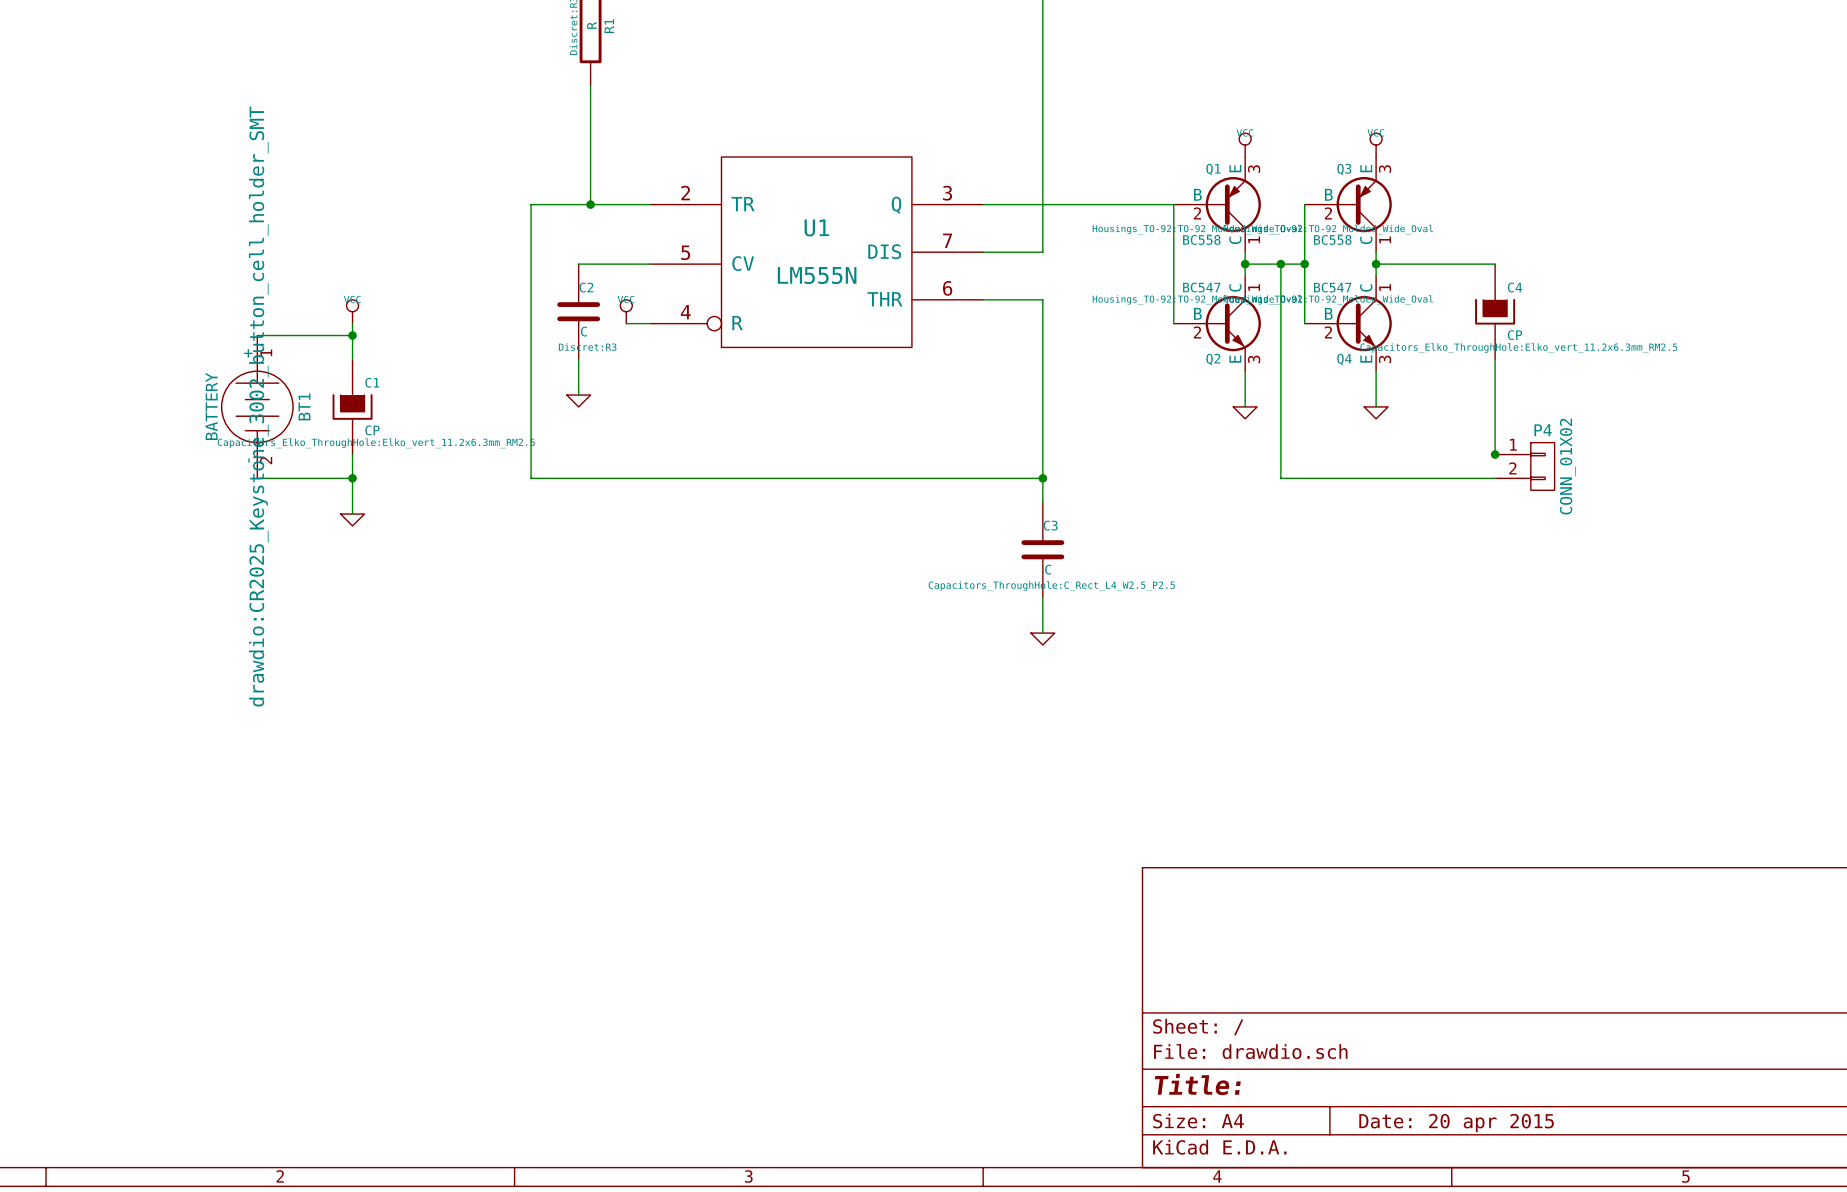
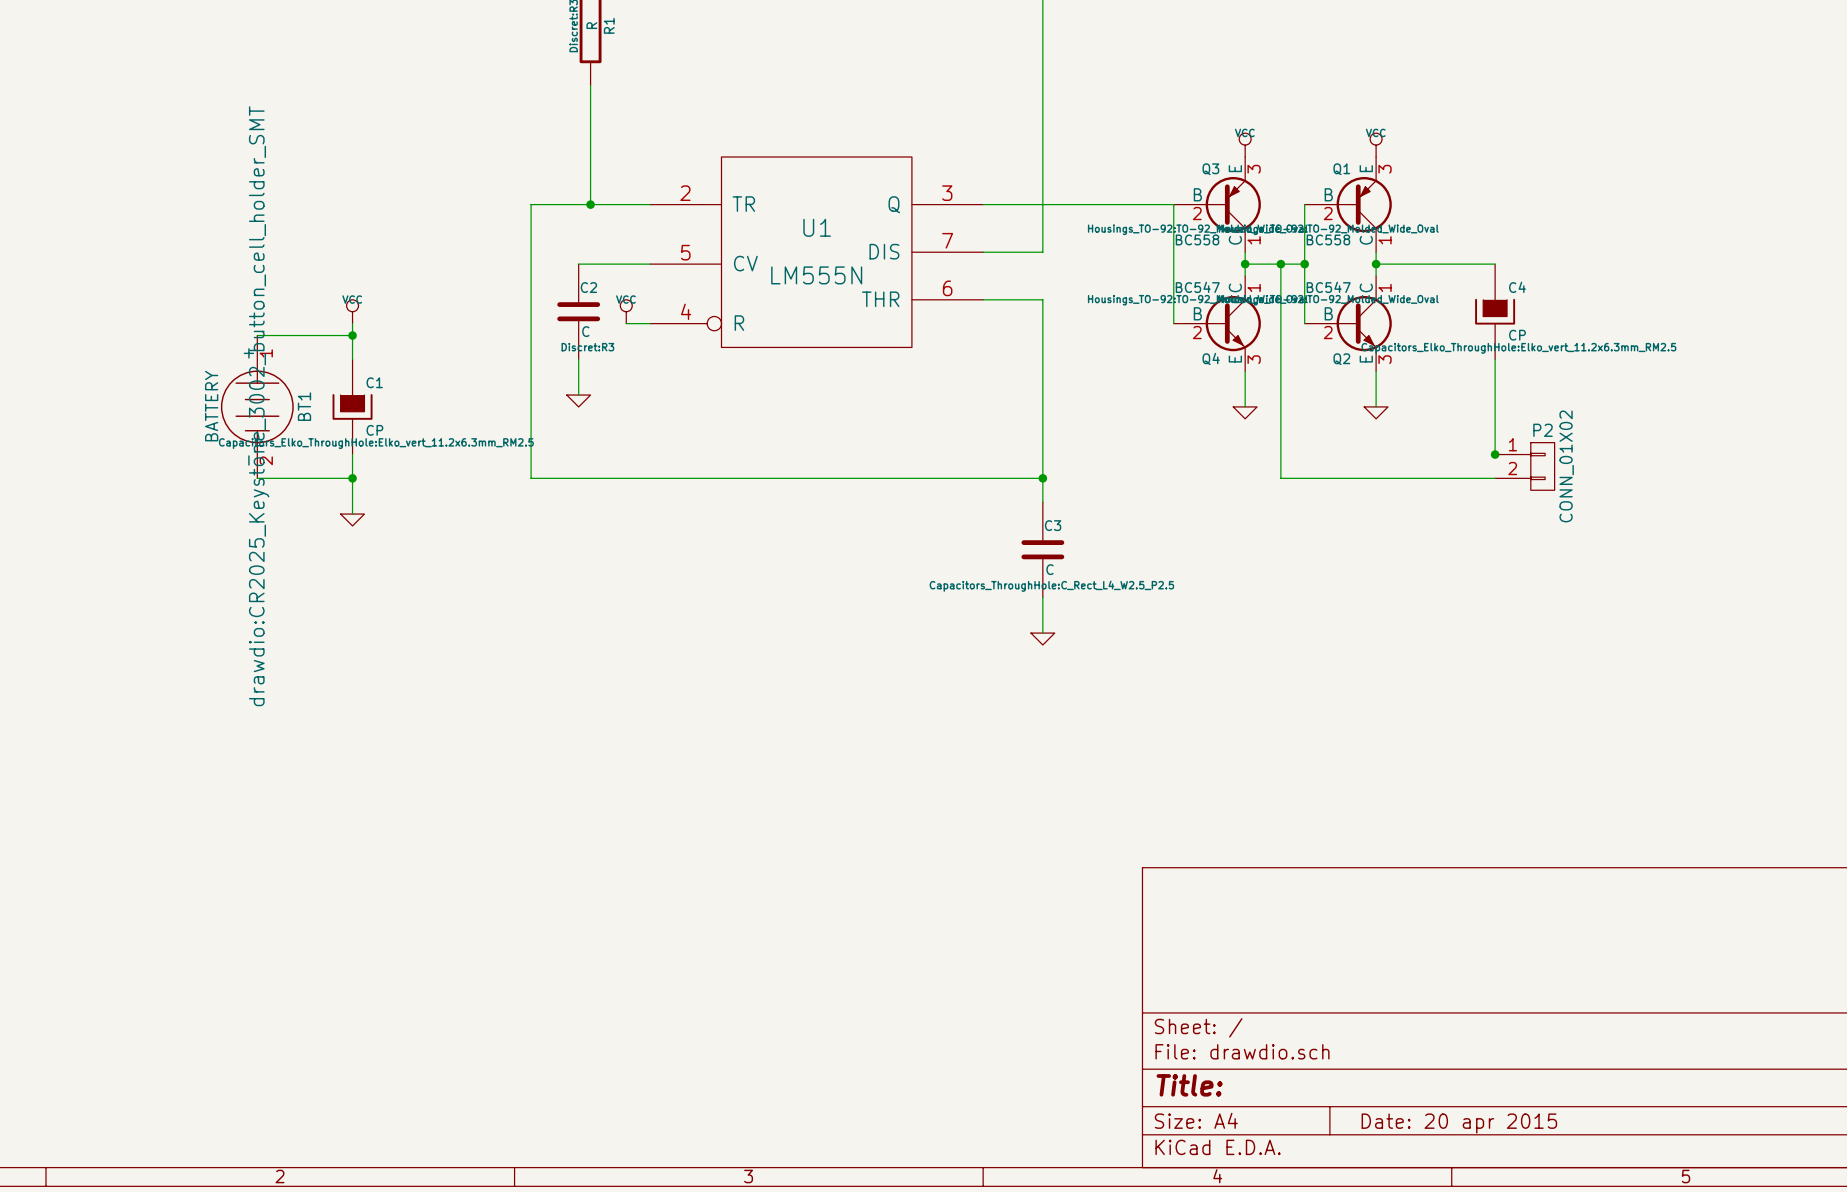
Q1 name: Q1 (1213, 169) -> Q3 (1210, 169)
Q3 name: Q3 (1344, 169) -> Q1 (1341, 169)
Q2 name: Q2 (1213, 359) -> Q4 (1211, 358)
Q4 name: Q4 (1344, 359) -> Q2 (1341, 359)
P4 name: P4 (1543, 430) -> P2 (1543, 430)

